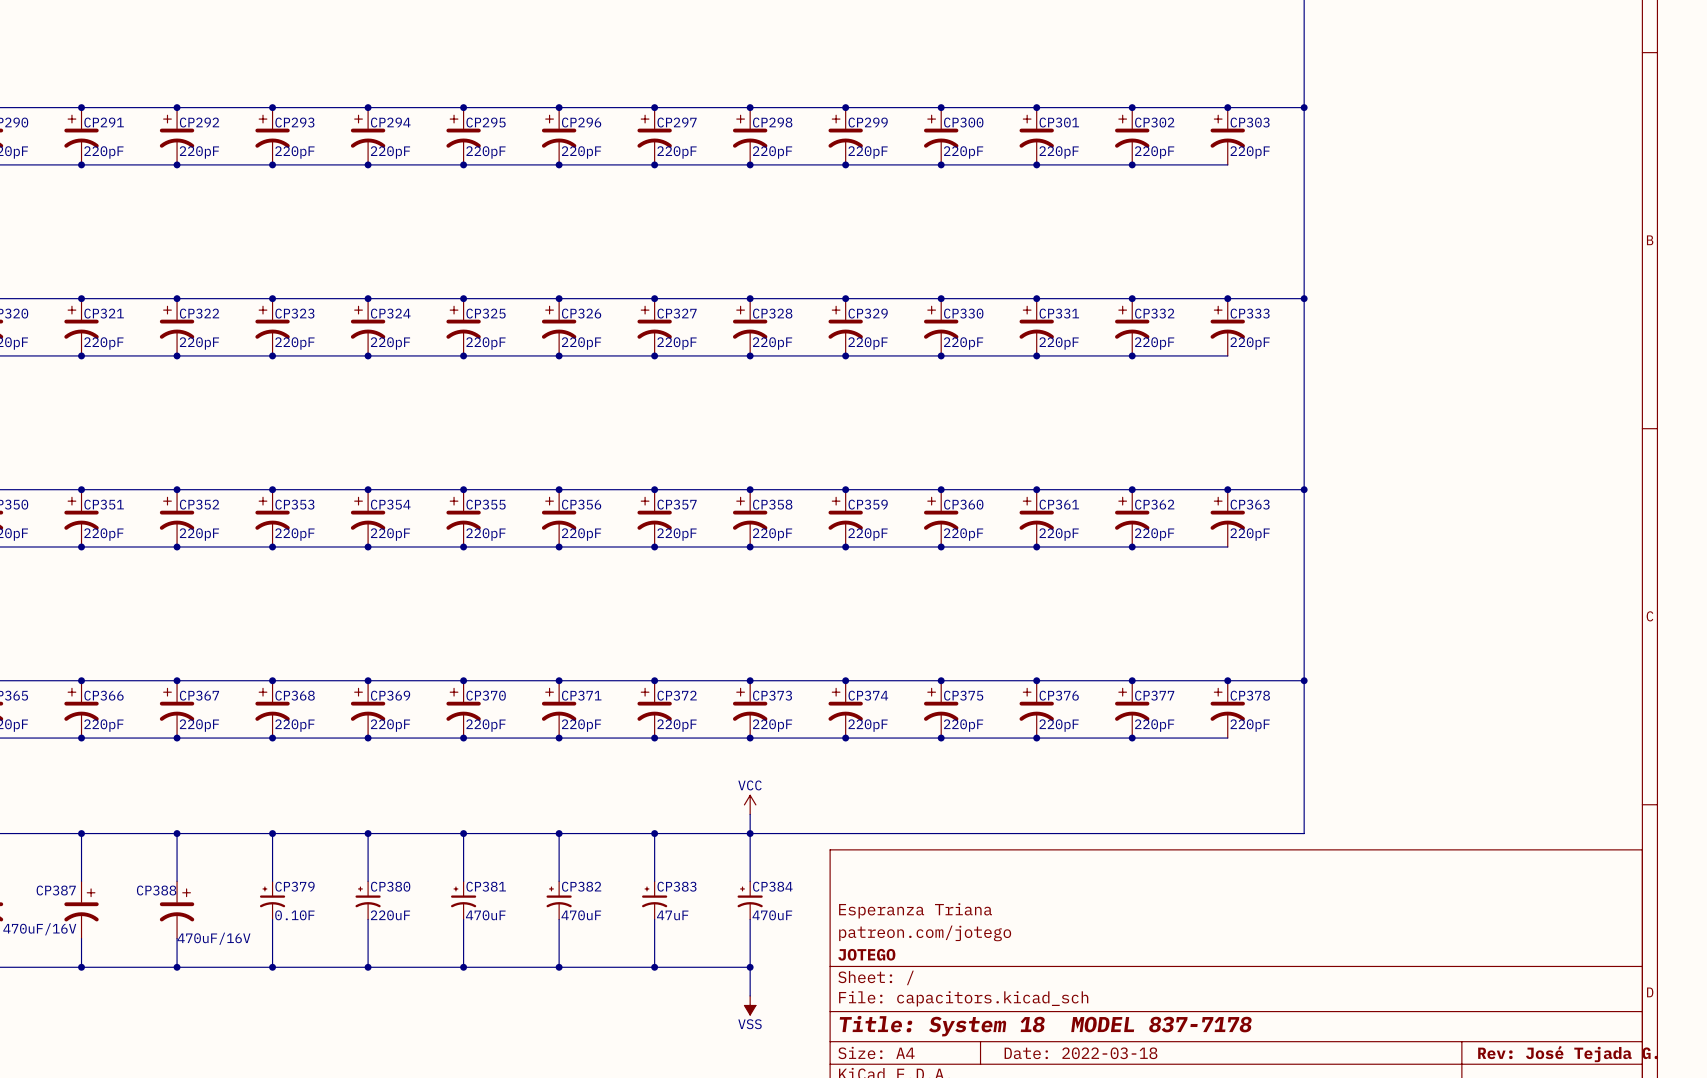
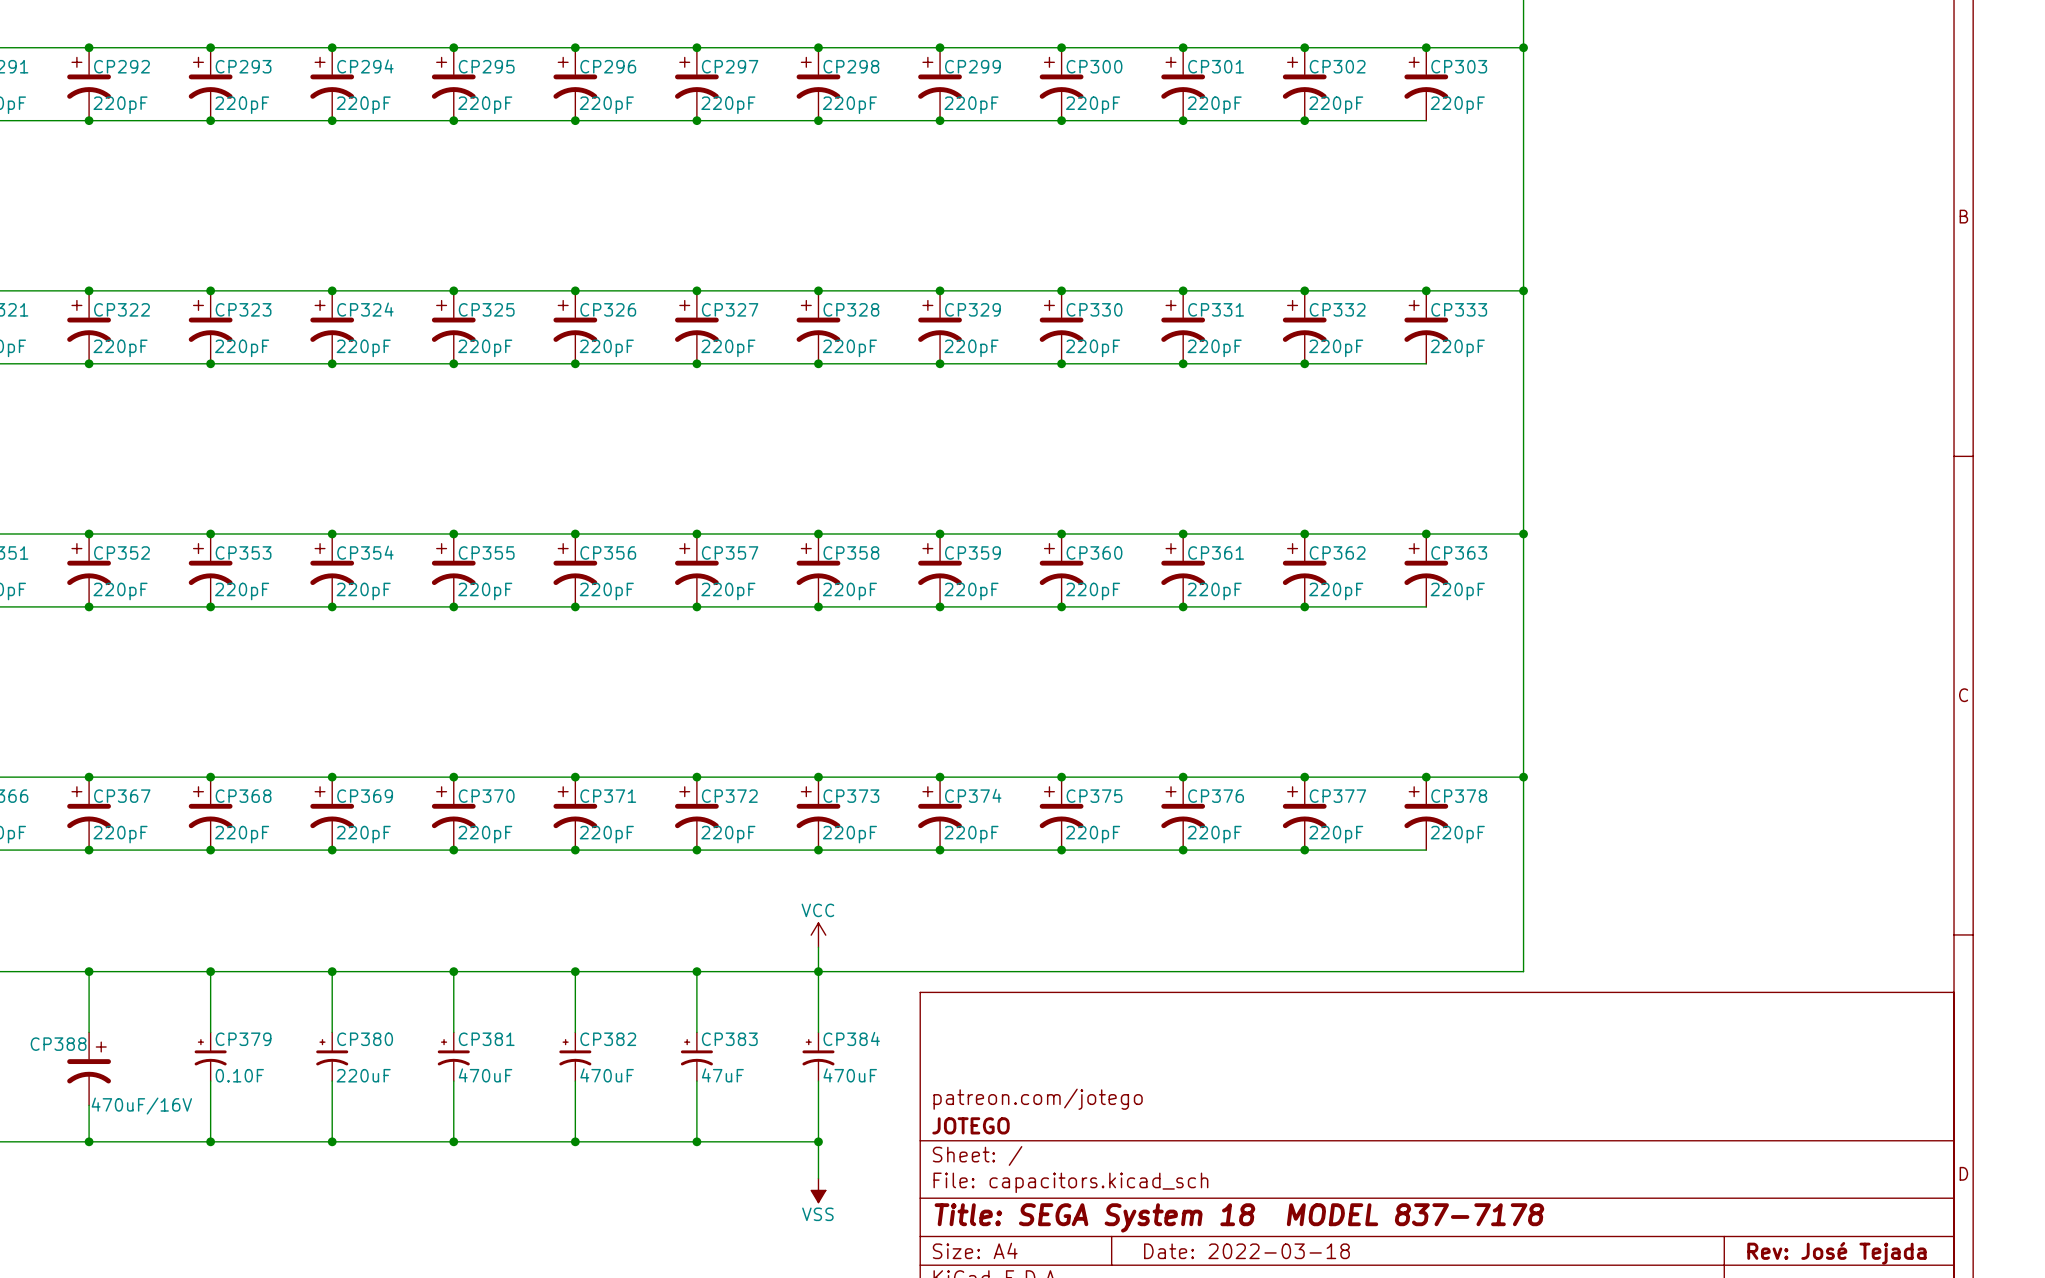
title block: Esperanza Triana (915, 910) -> none
title block: Title: System 18 MODEL 837-7178 (1045, 1026) -> Title: SEGA System 18 MODEL 837-7178 (1239, 1217)
title block: Rev: José Tejada G. (1568, 1054) -> Rev: José Tejada (1836, 1253)

